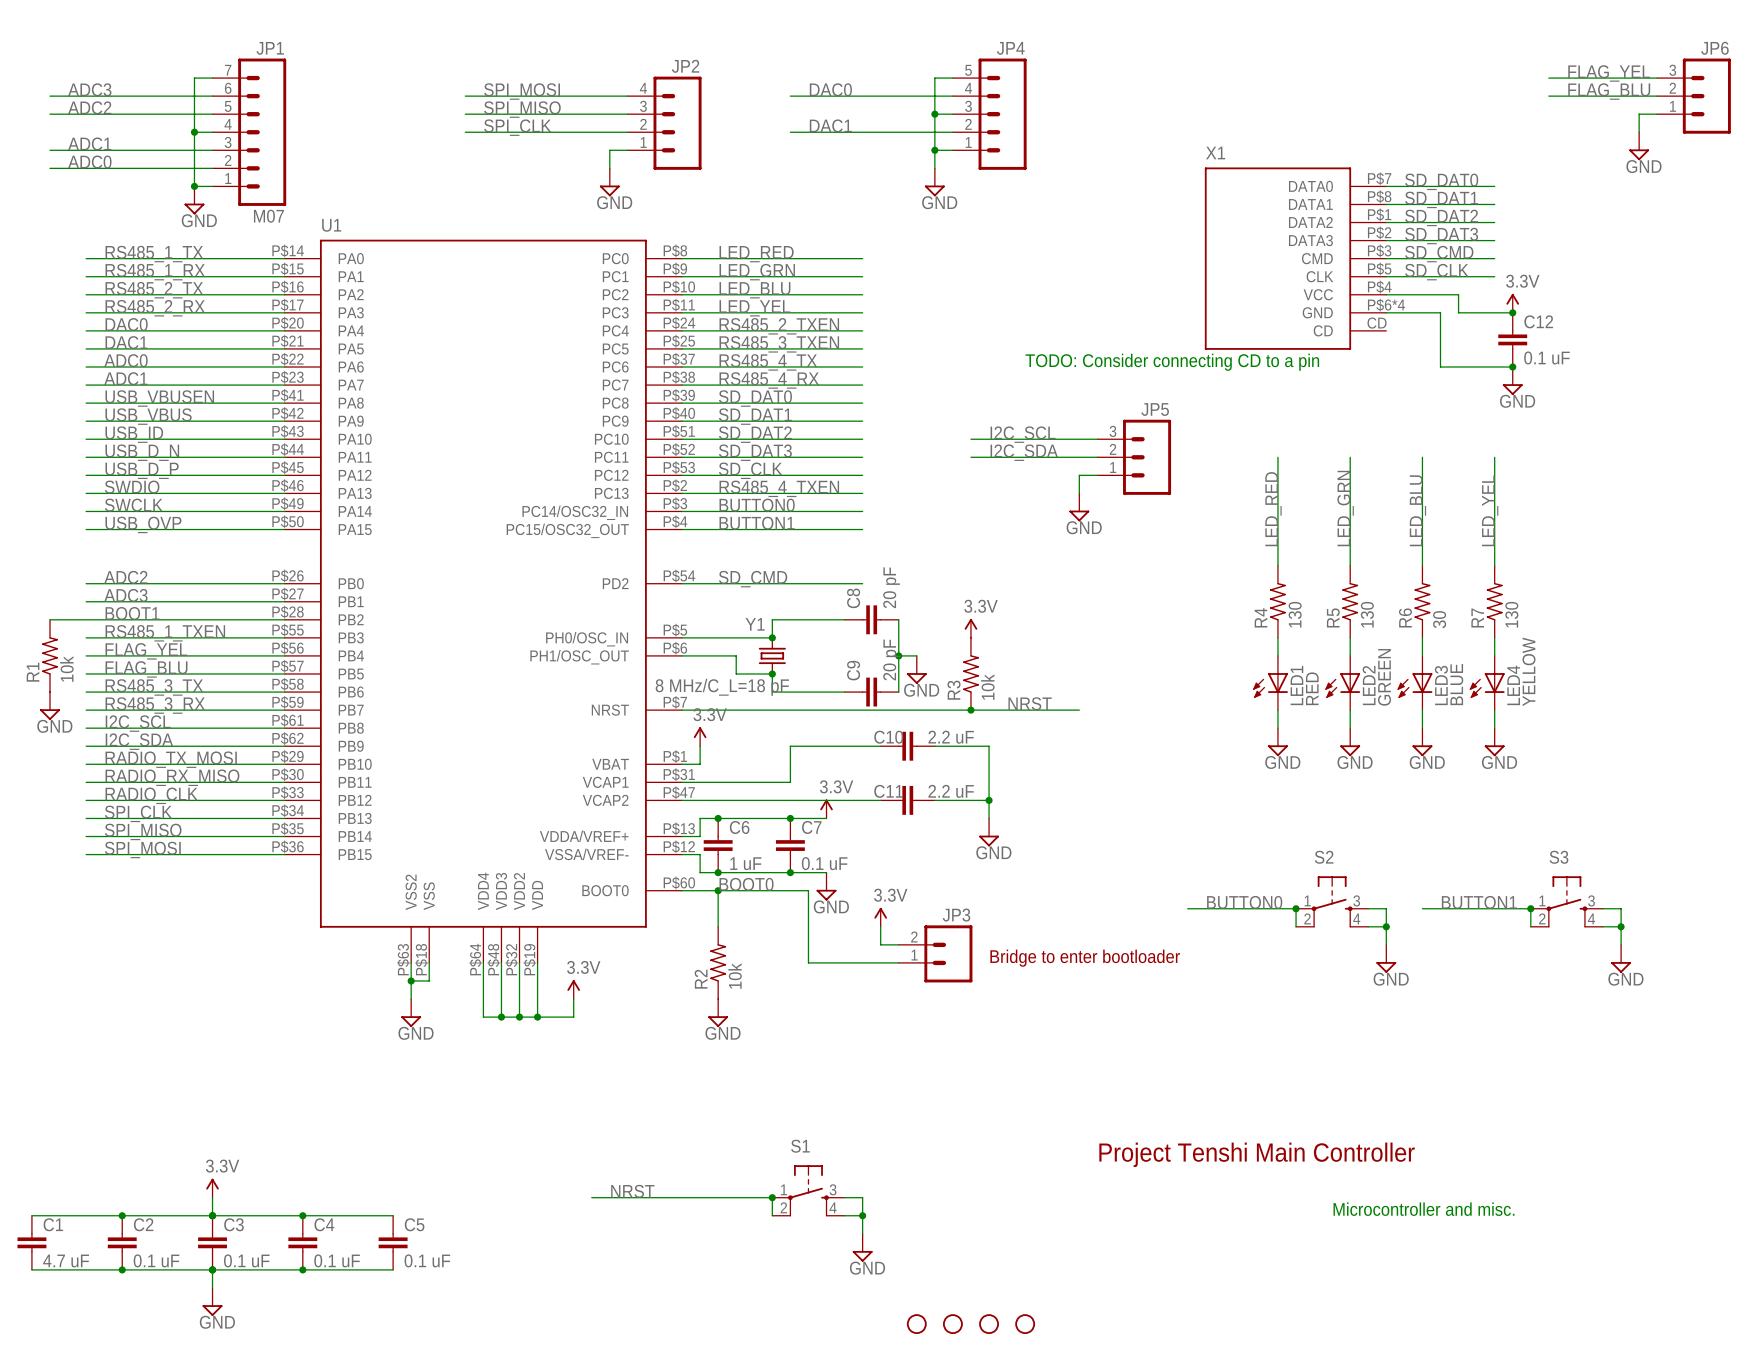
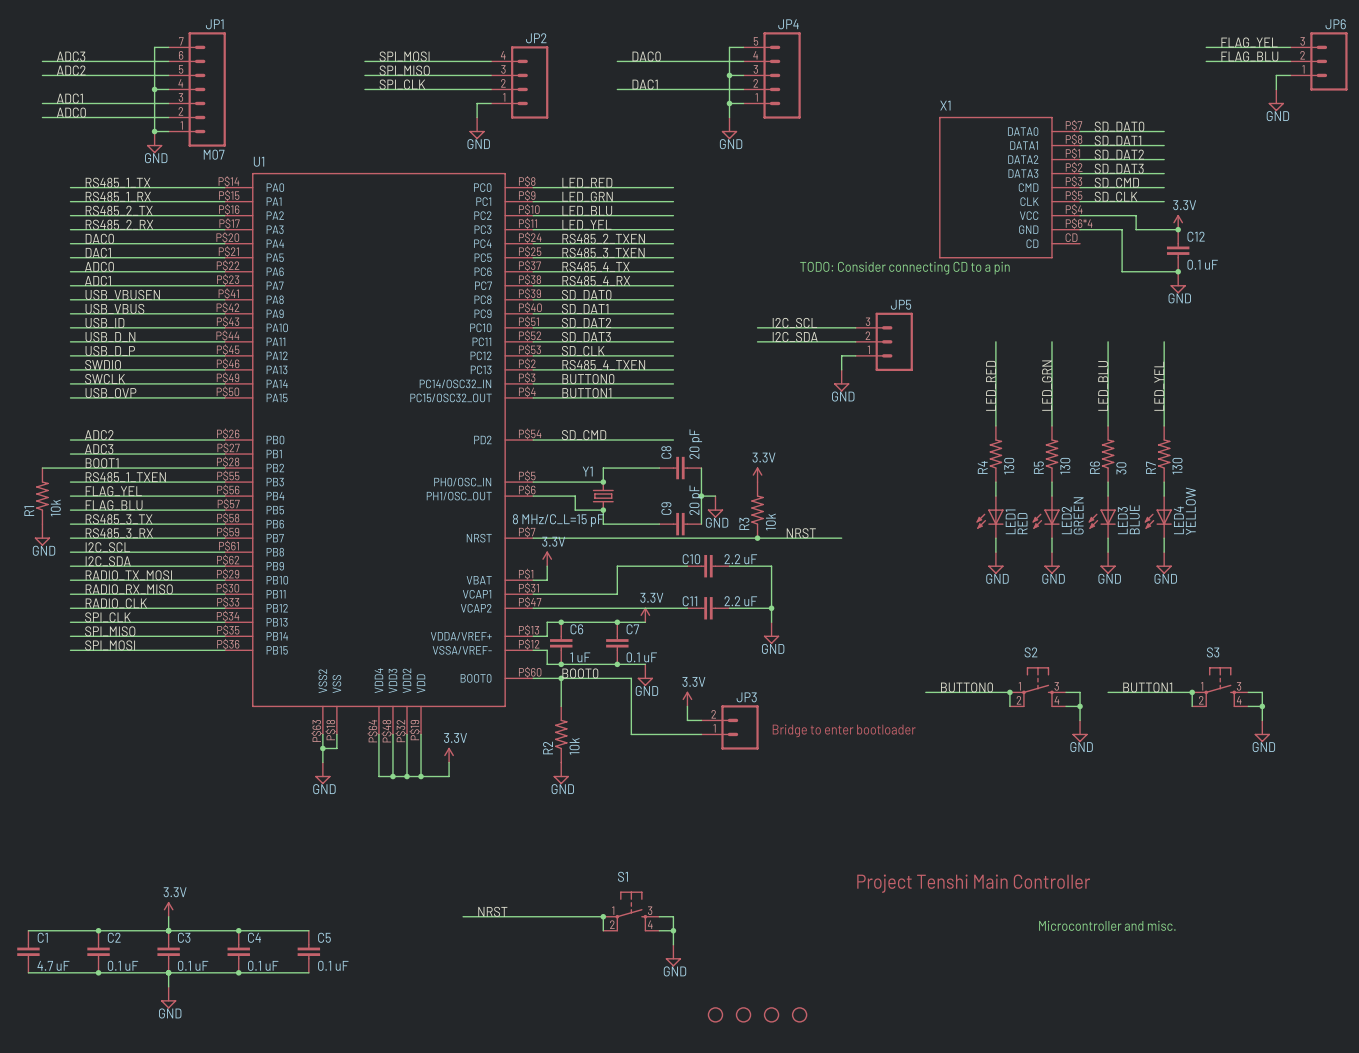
Y1 value: 8 MHz/C_L=18 pF (722, 687) -> 8 MHz/C_L=15 pF (558, 520)

